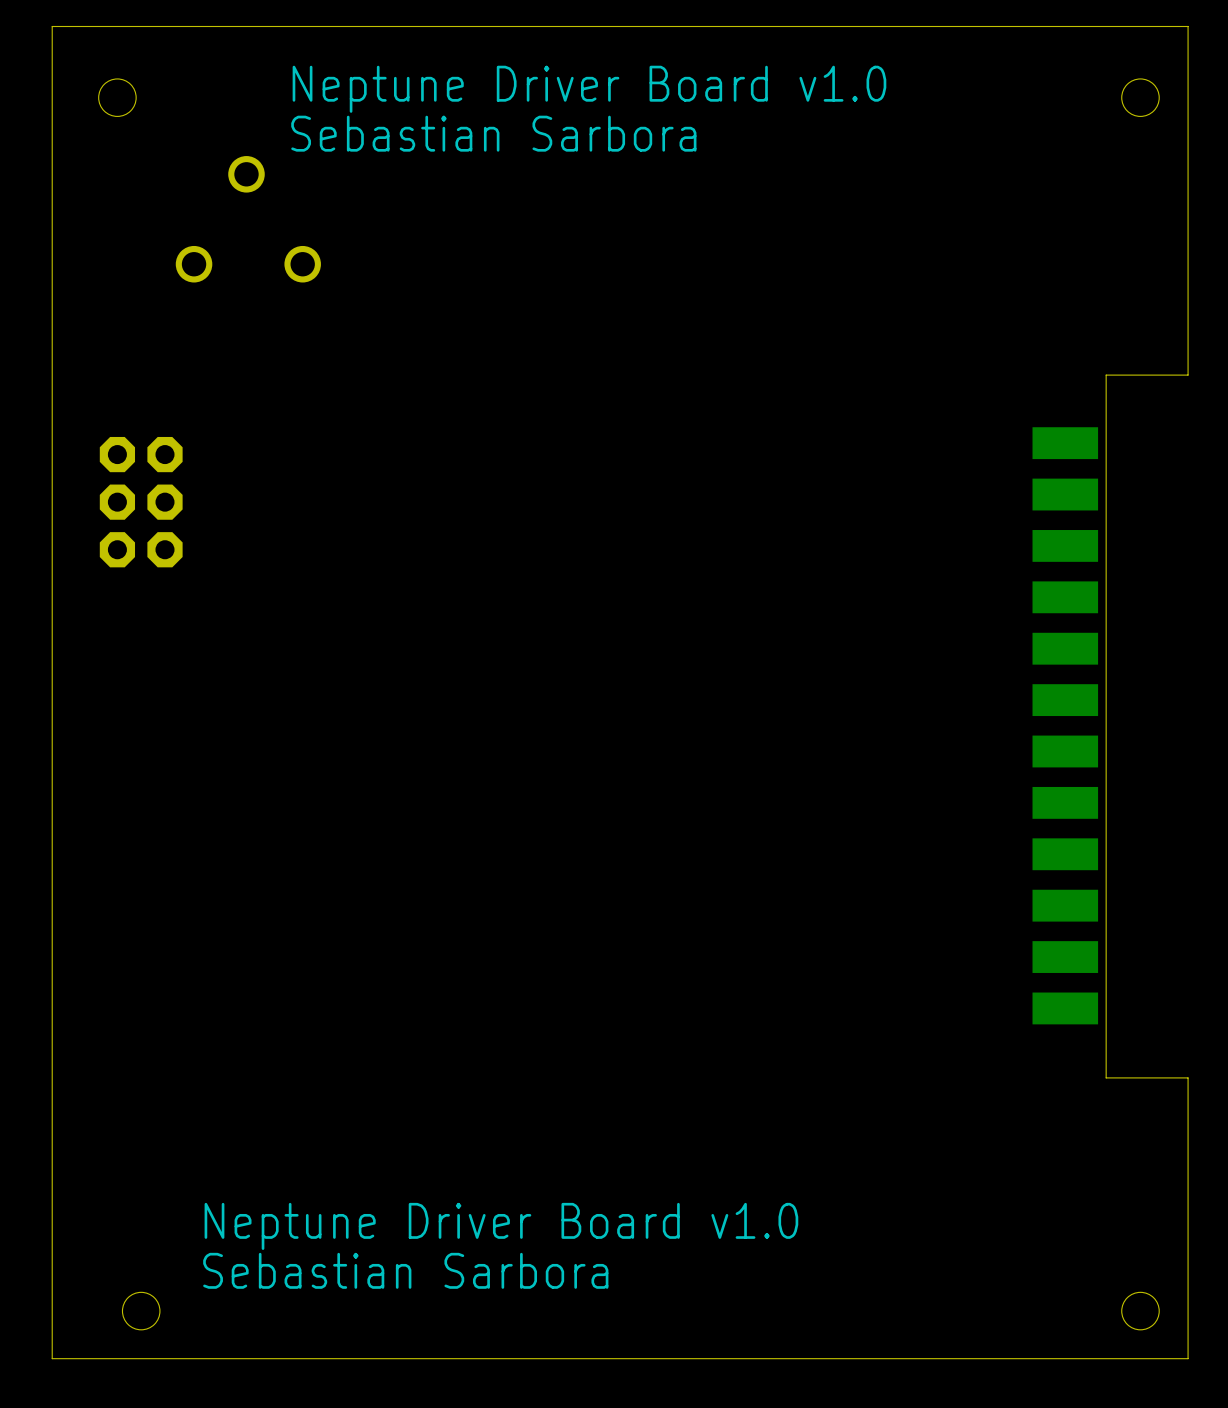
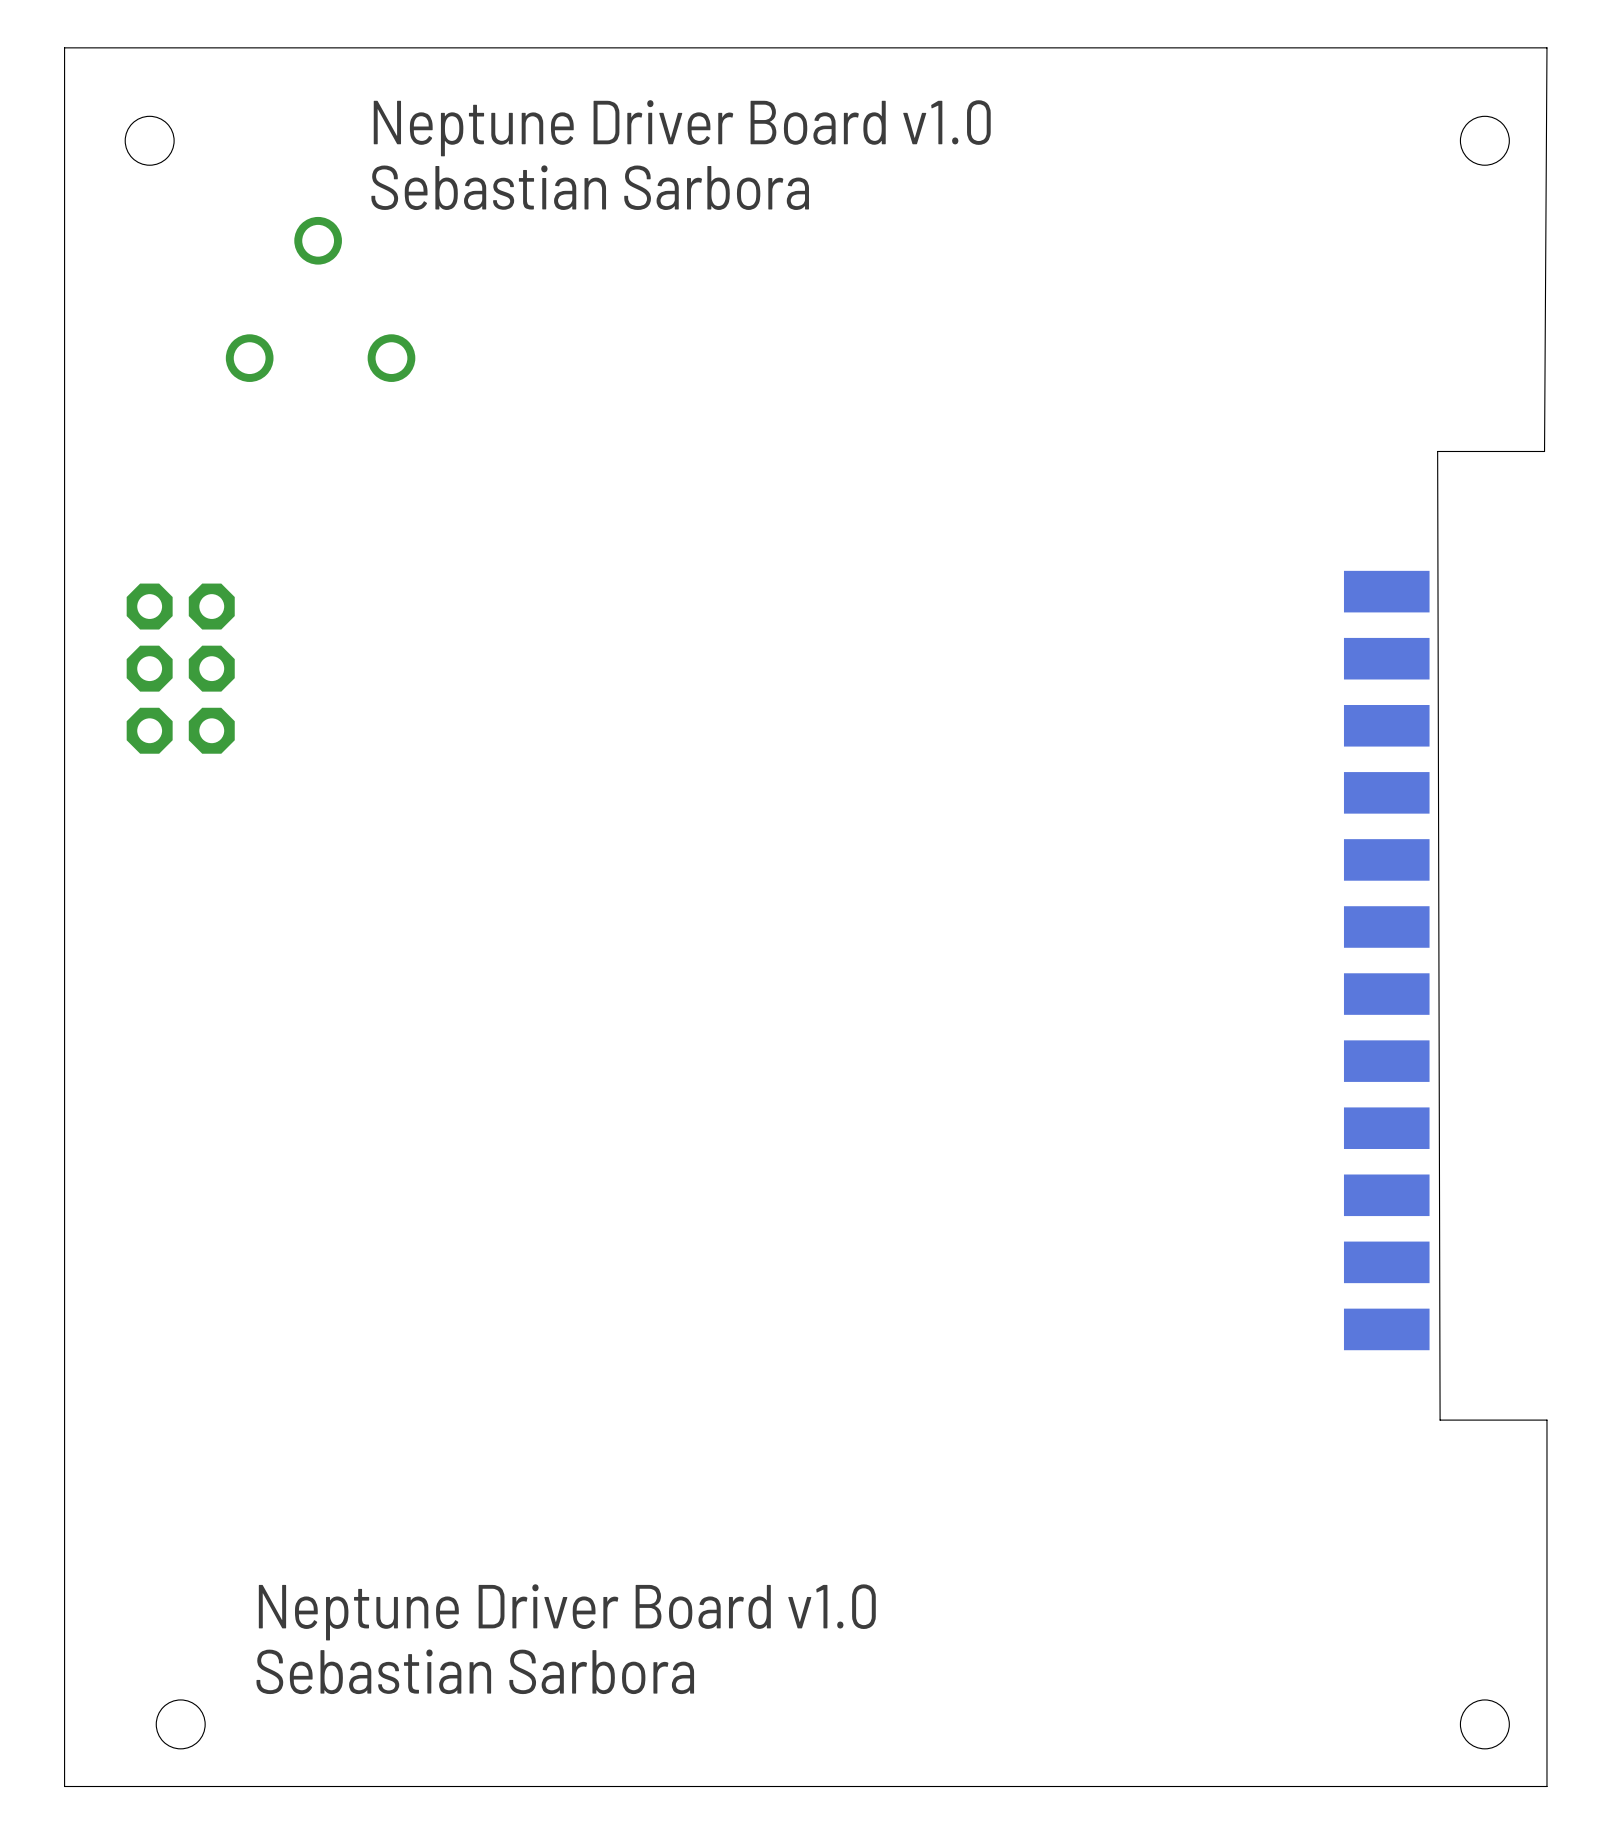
board edge: (1188, 26) (1188, 375) (1106, 375) (1106, 1077) -> (1546, 47) (1544, 451) (1437, 451) (1440, 1420)

